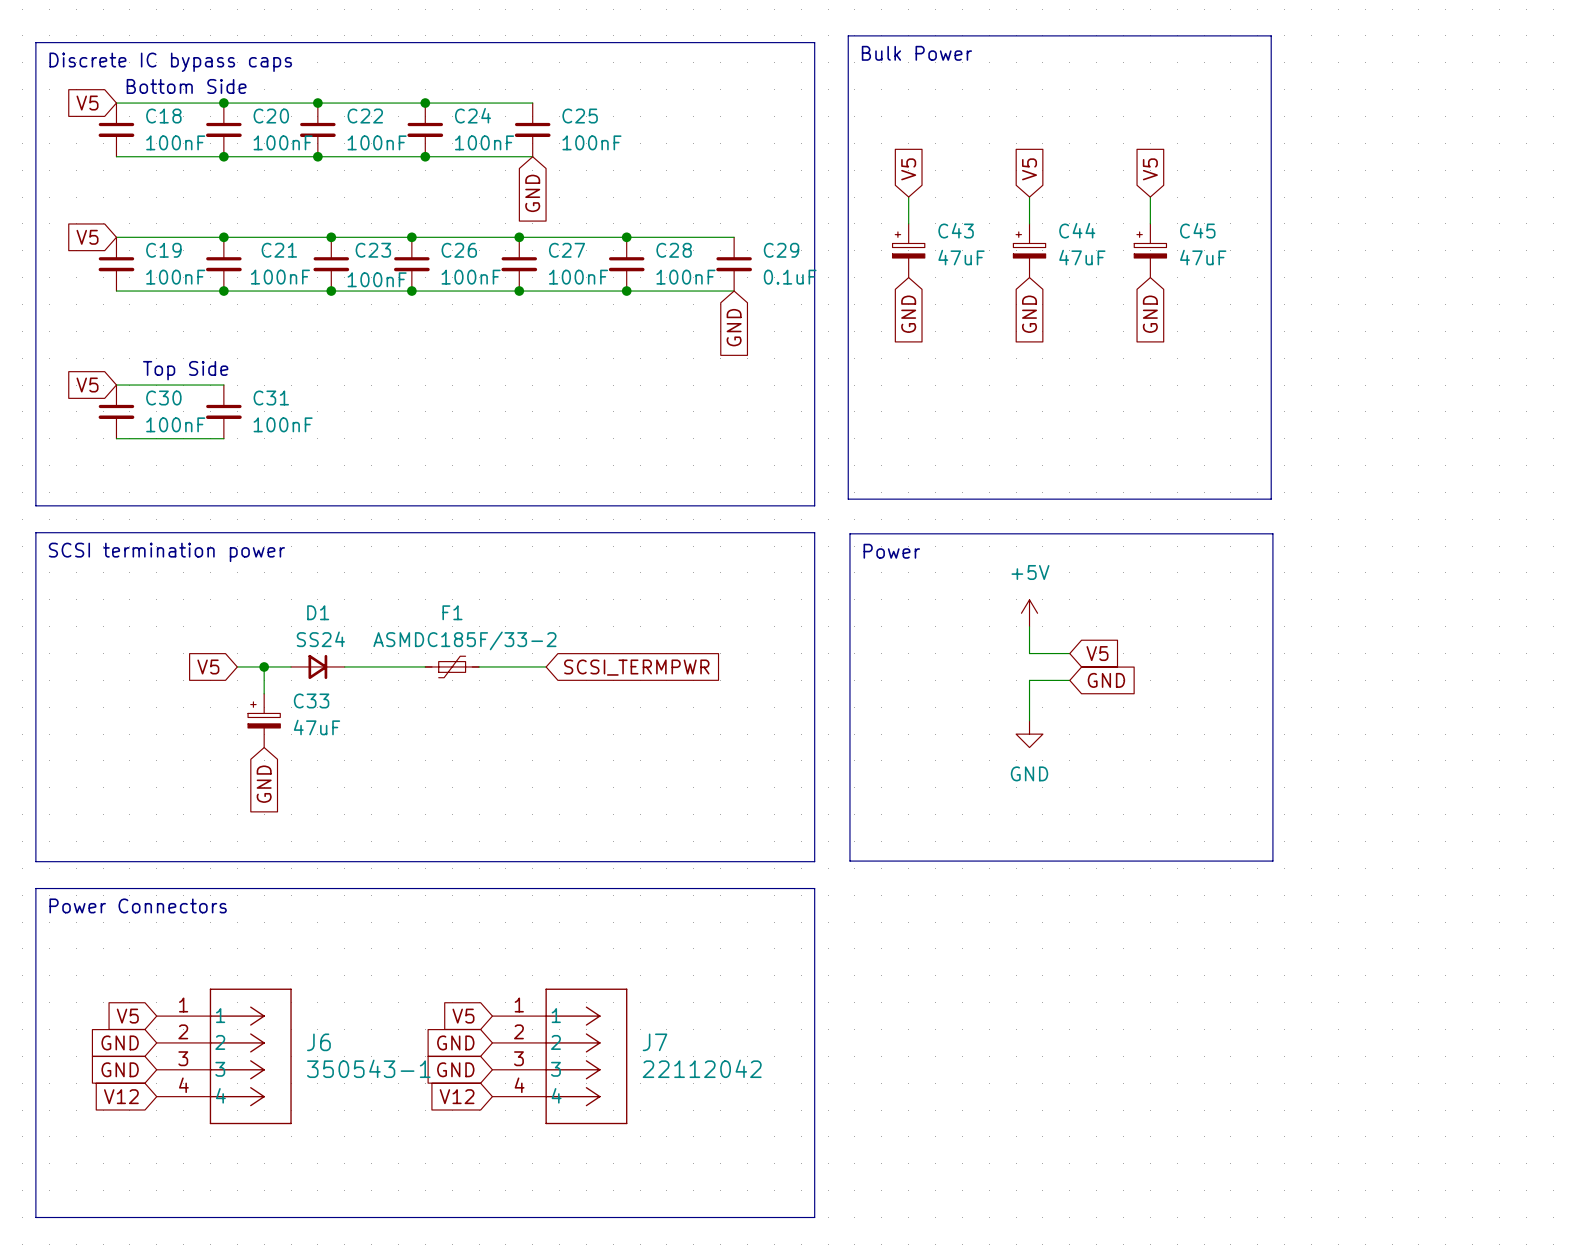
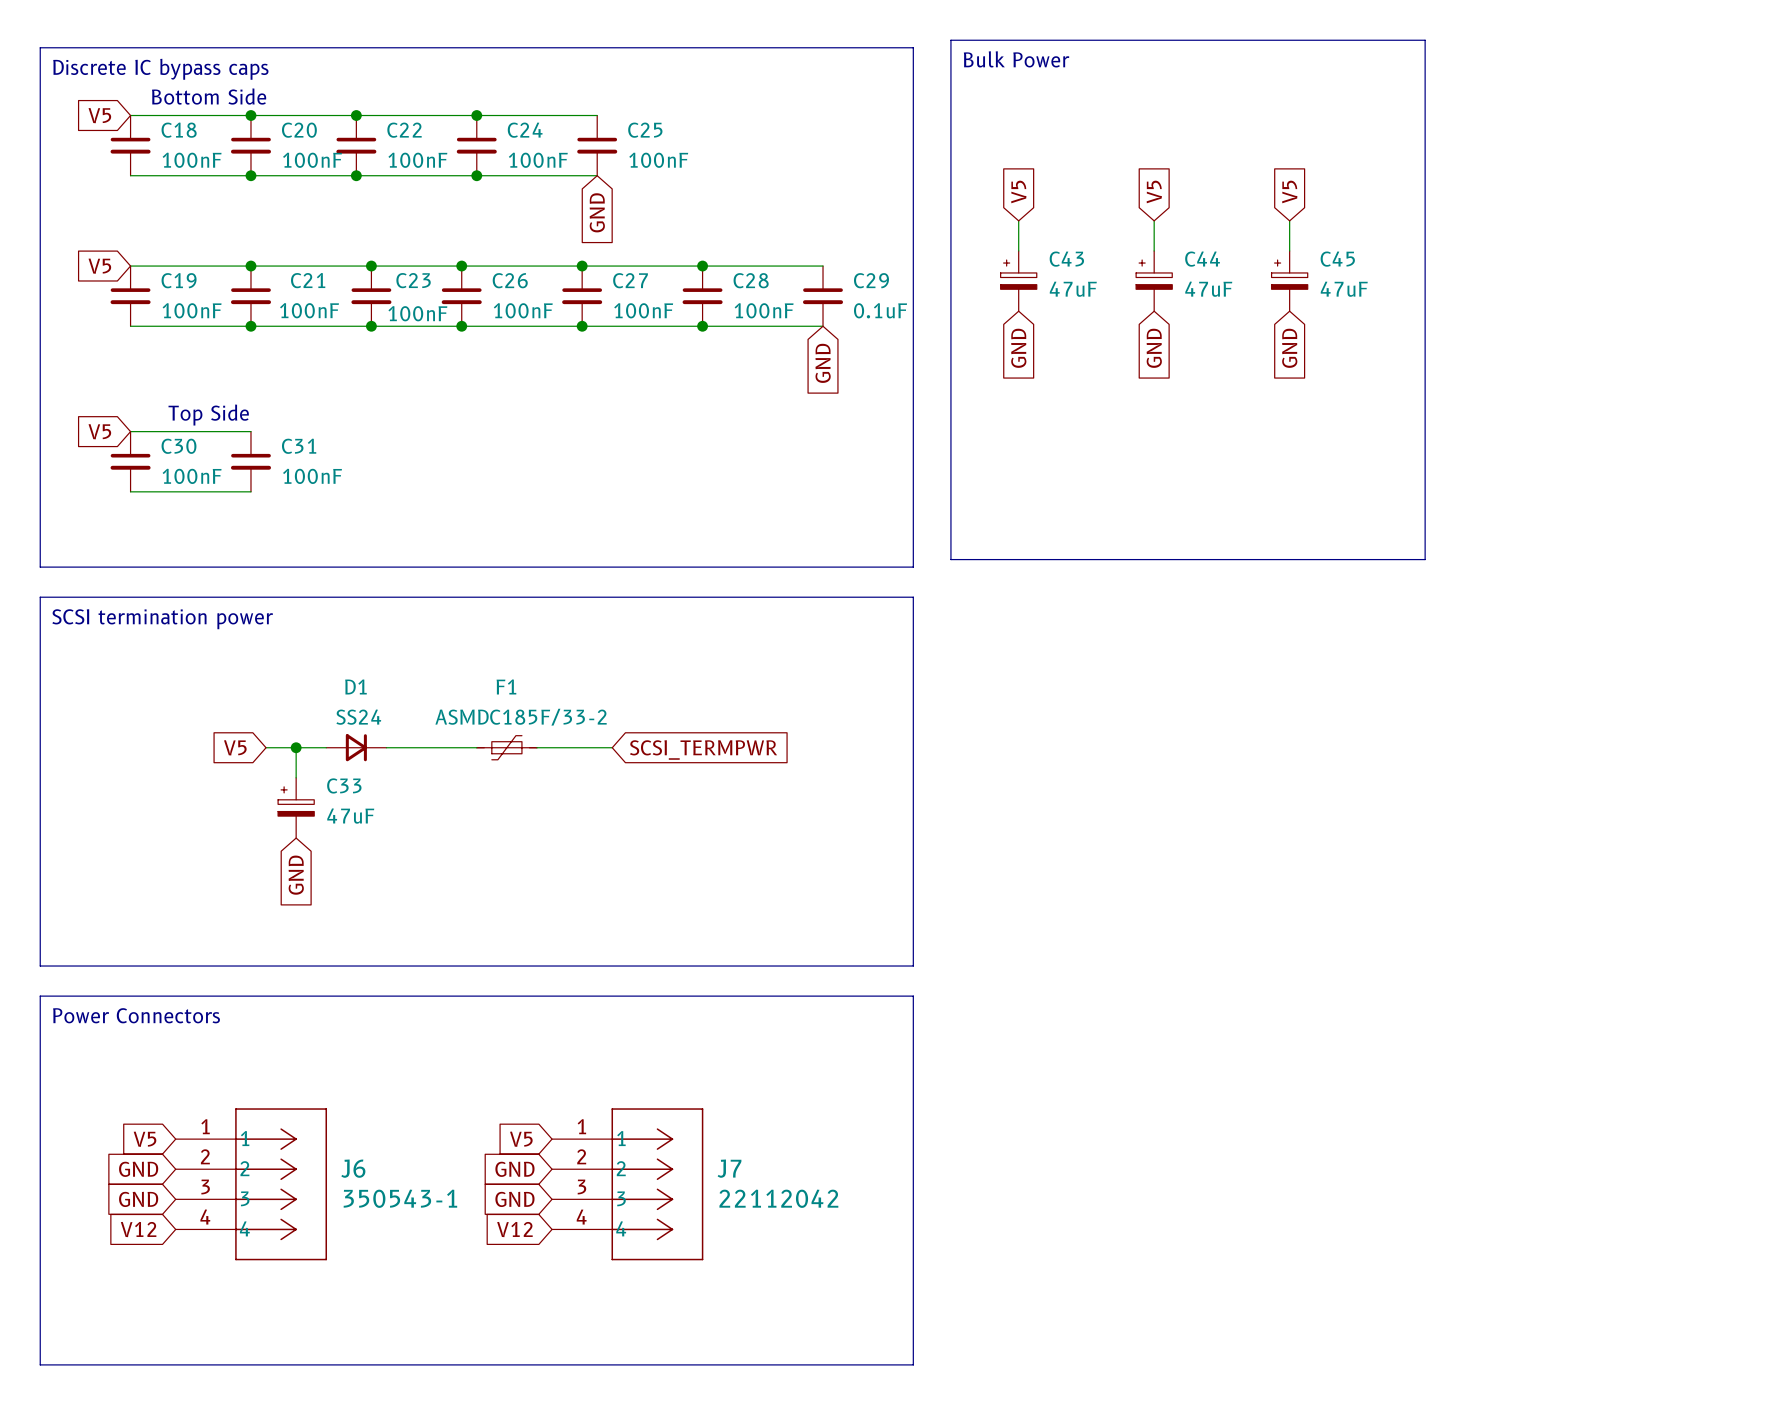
line: (849, 533) (1272, 533) (1272, 861) (849, 861) (849, 533) -> none
text: Power (891, 551) -> none
power symbol: +5V (1029, 613) -> none
wire: (1029, 626) (1029, 653) (1069, 653) -> none
global label: V5 (1097, 653) -> none
wire: (1069, 680) (1029, 680) (1029, 720) -> none
global label: GND (1106, 680) -> none
power symbol: GND (1029, 734) -> none

